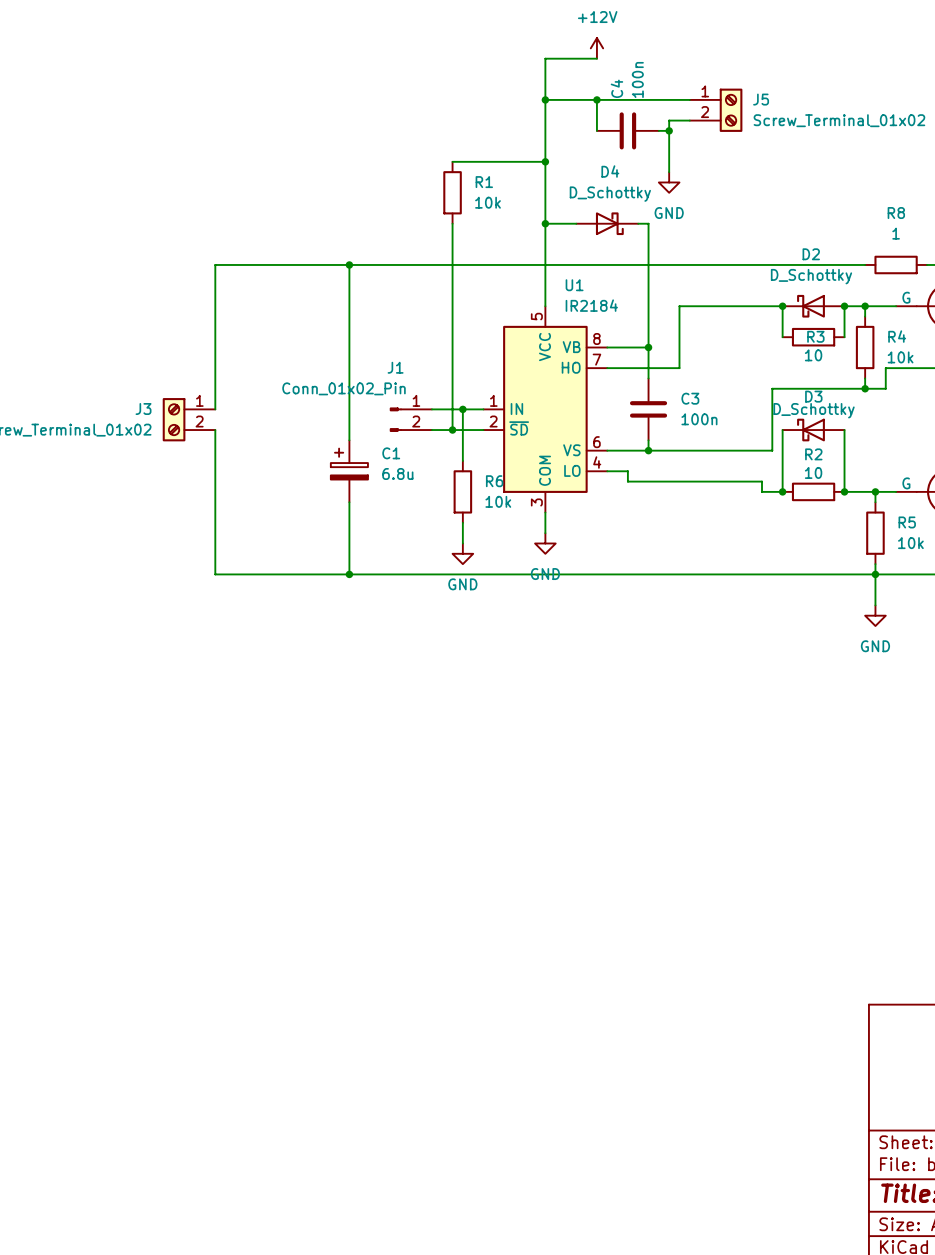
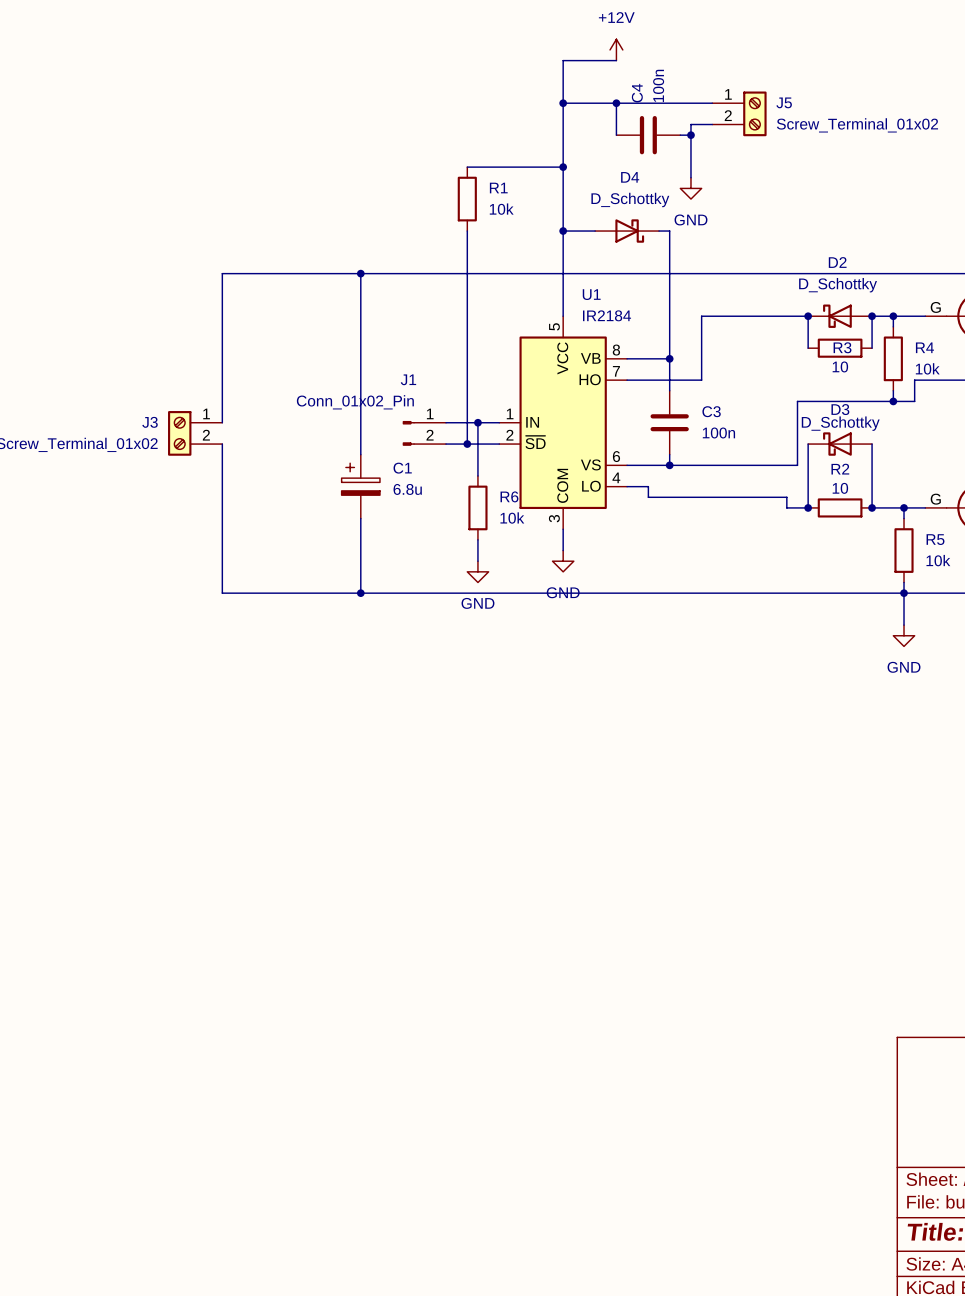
wire: none -> (893, 273) (957, 273)
R8: 1 (896, 264) -> none

